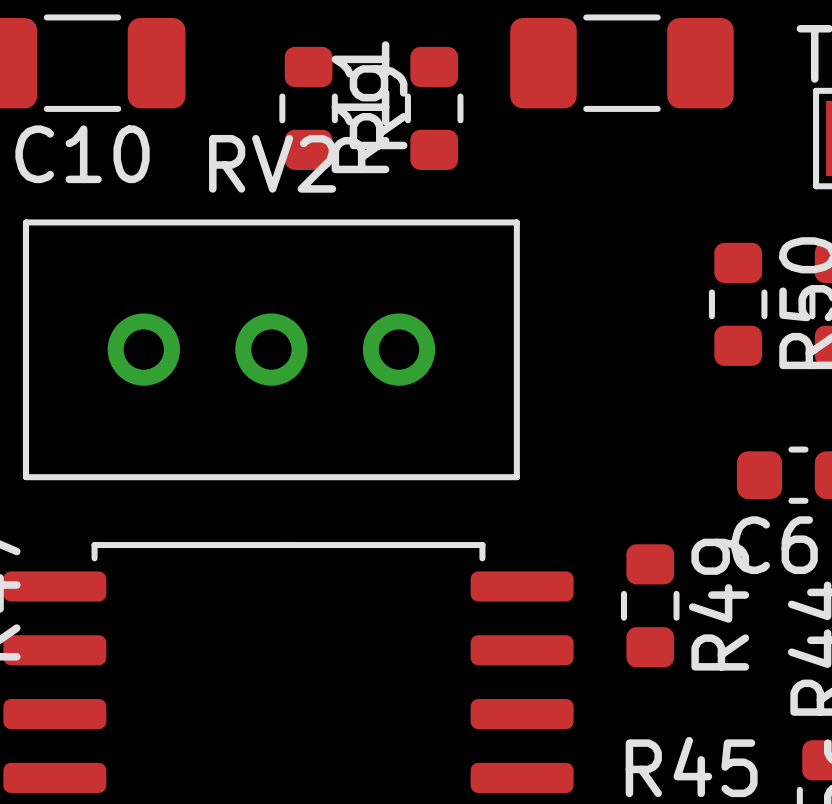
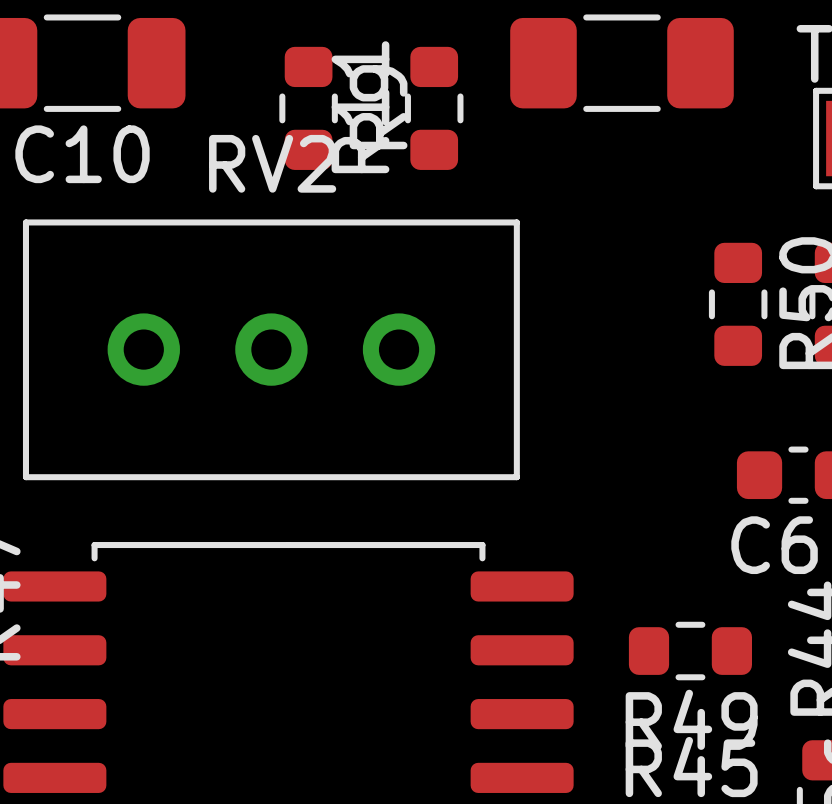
R49 rotation: 0° (650, 605) -> 90° clockwise (690, 651)

